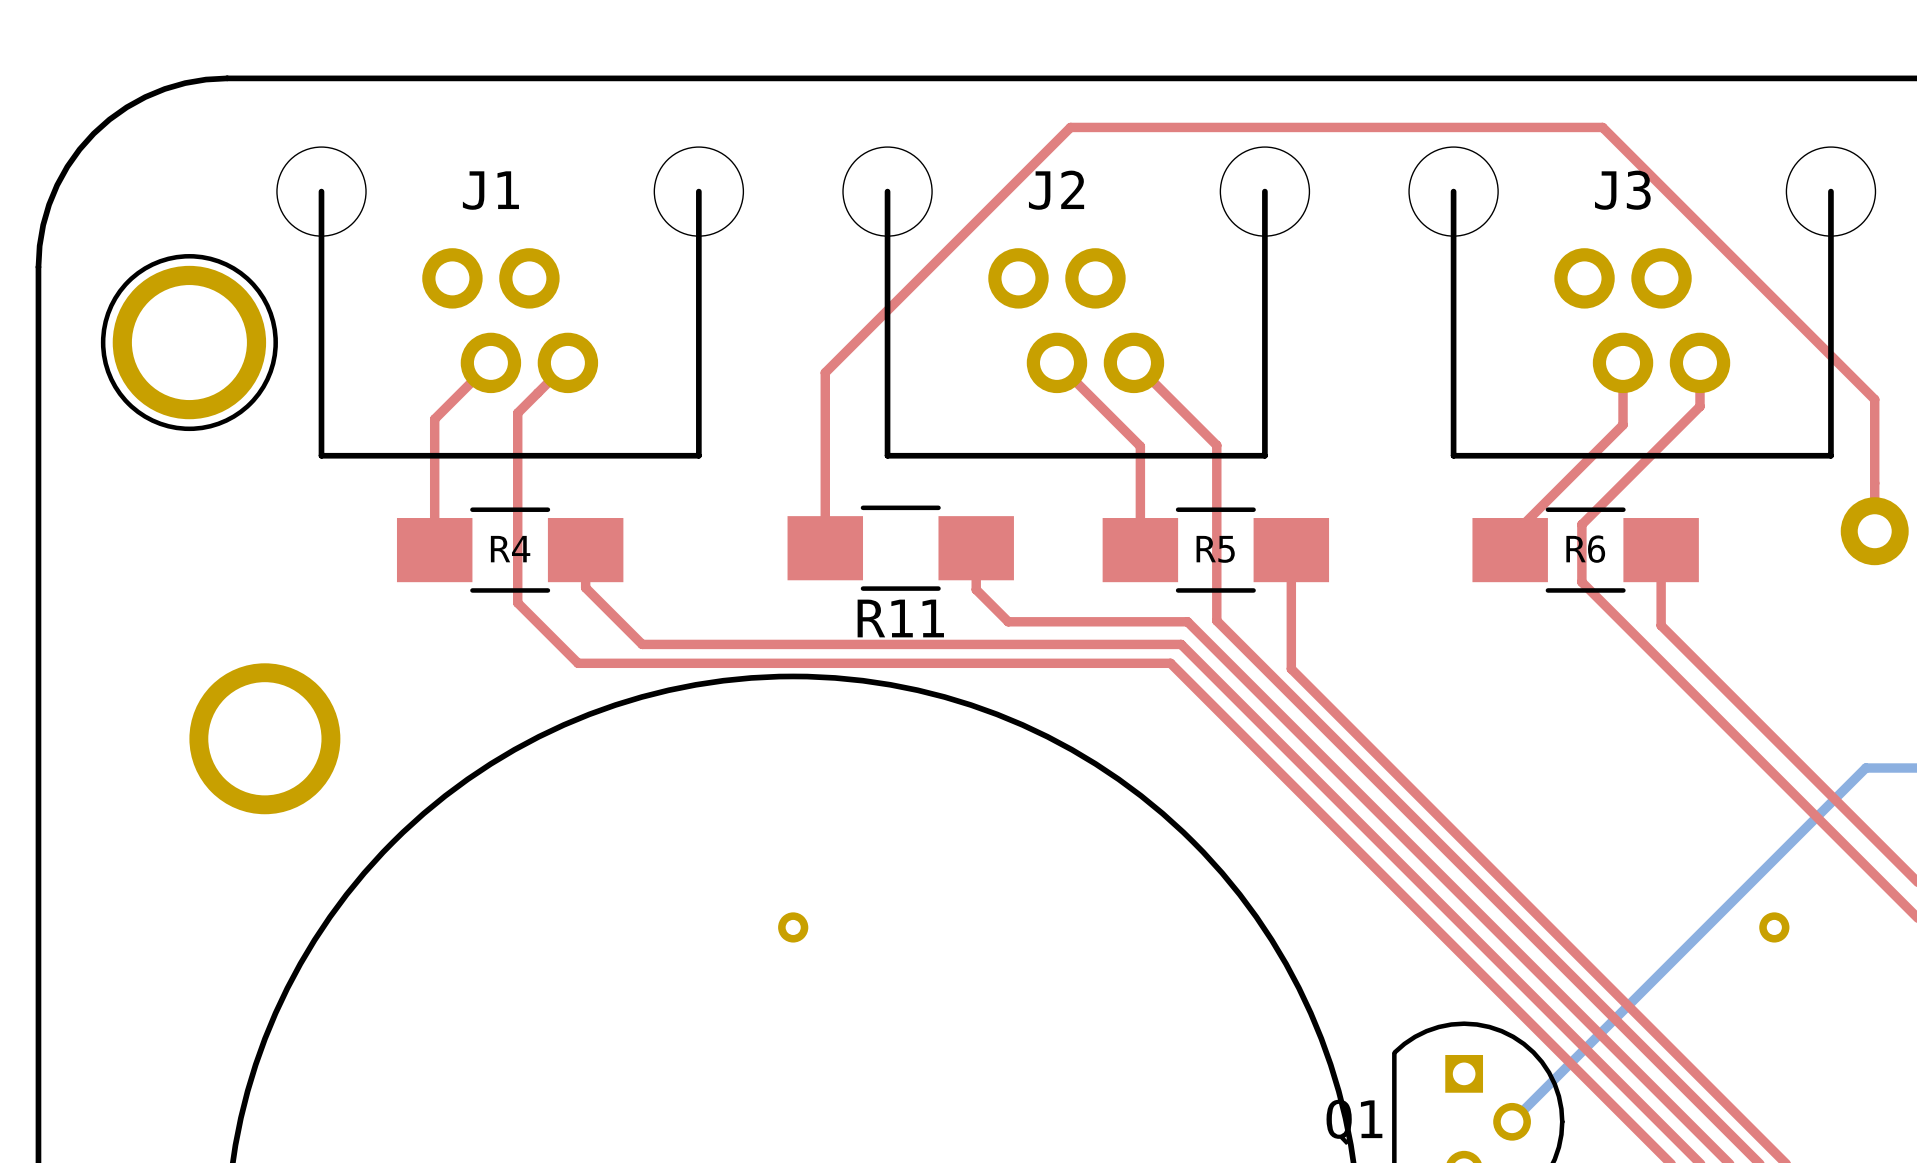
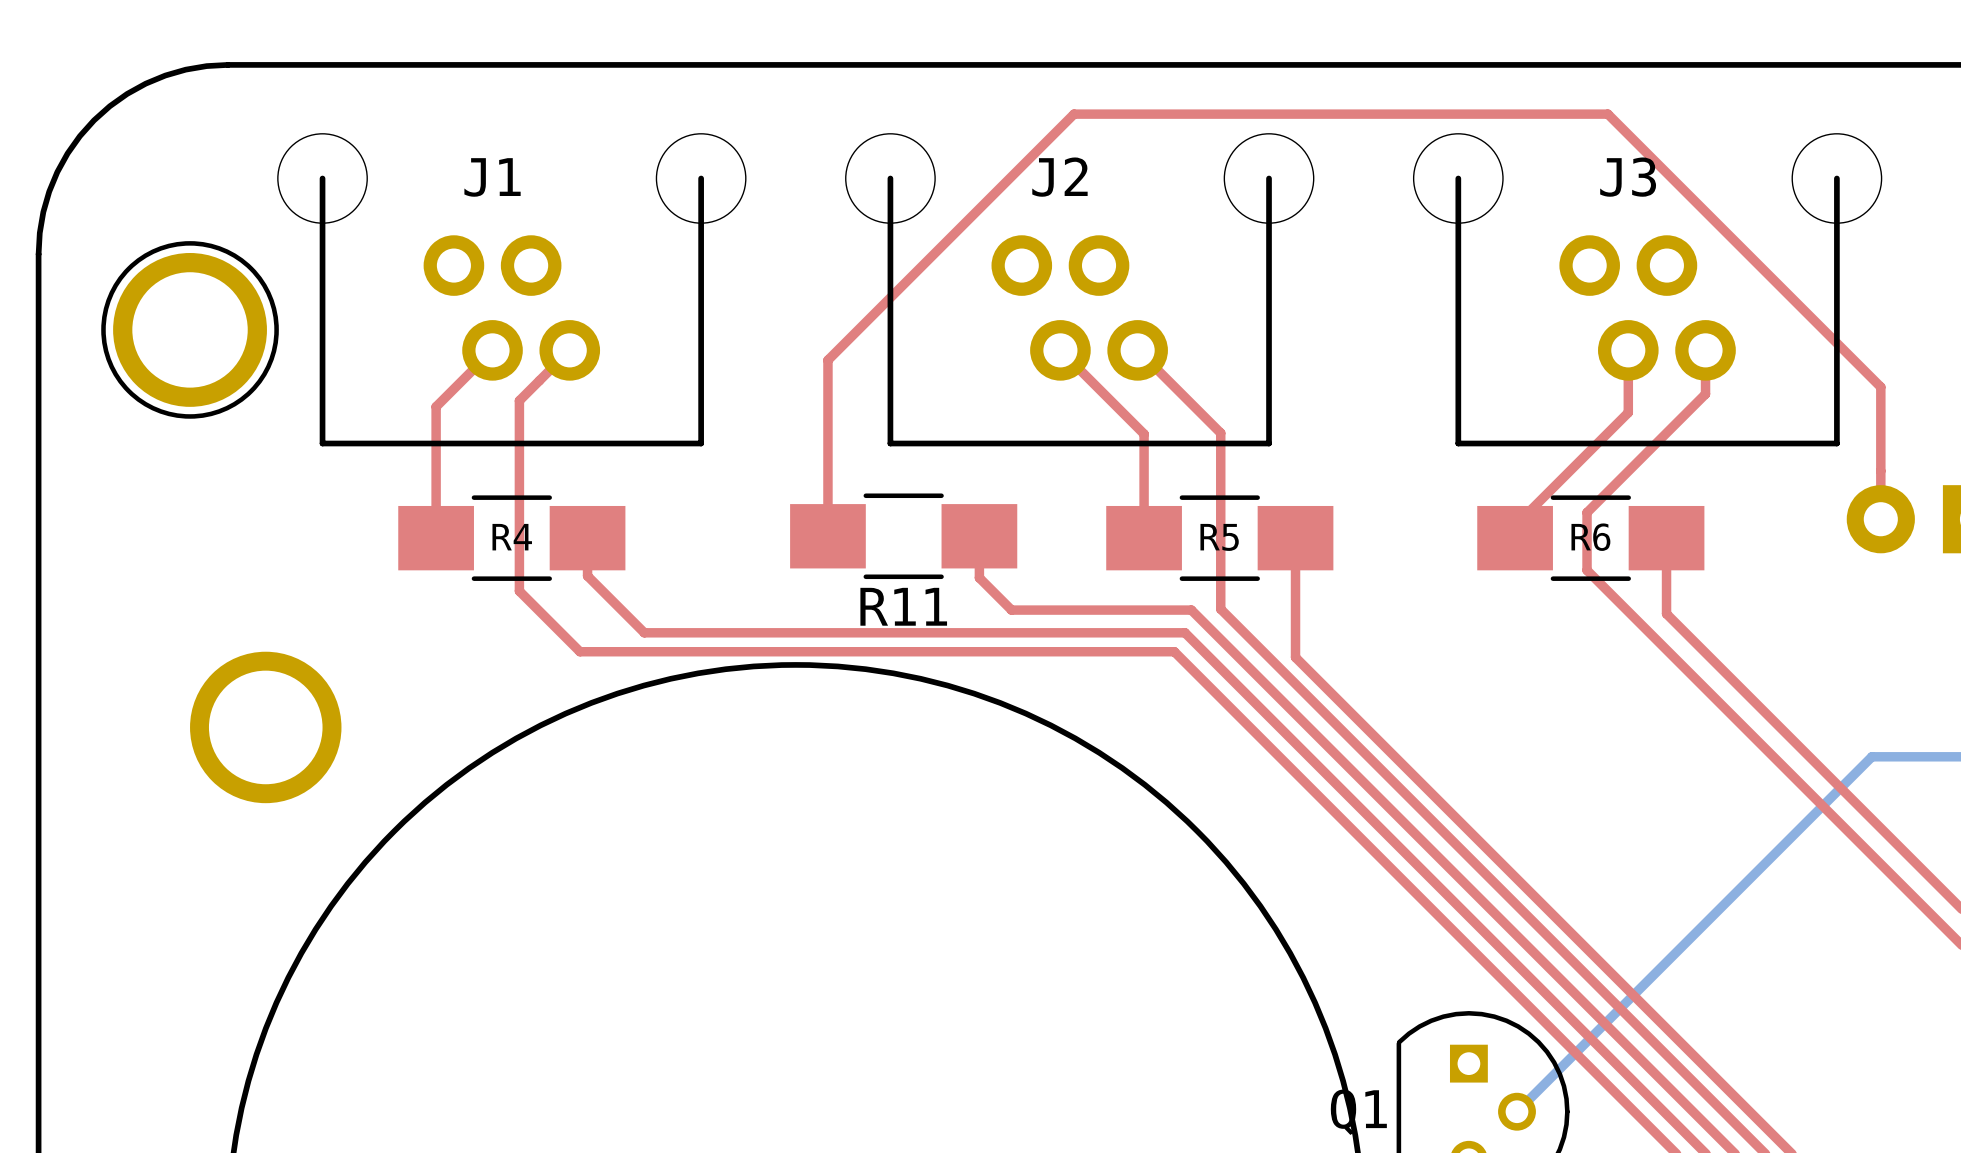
part: (793, 927) -> none
part: (1774, 927) -> none

